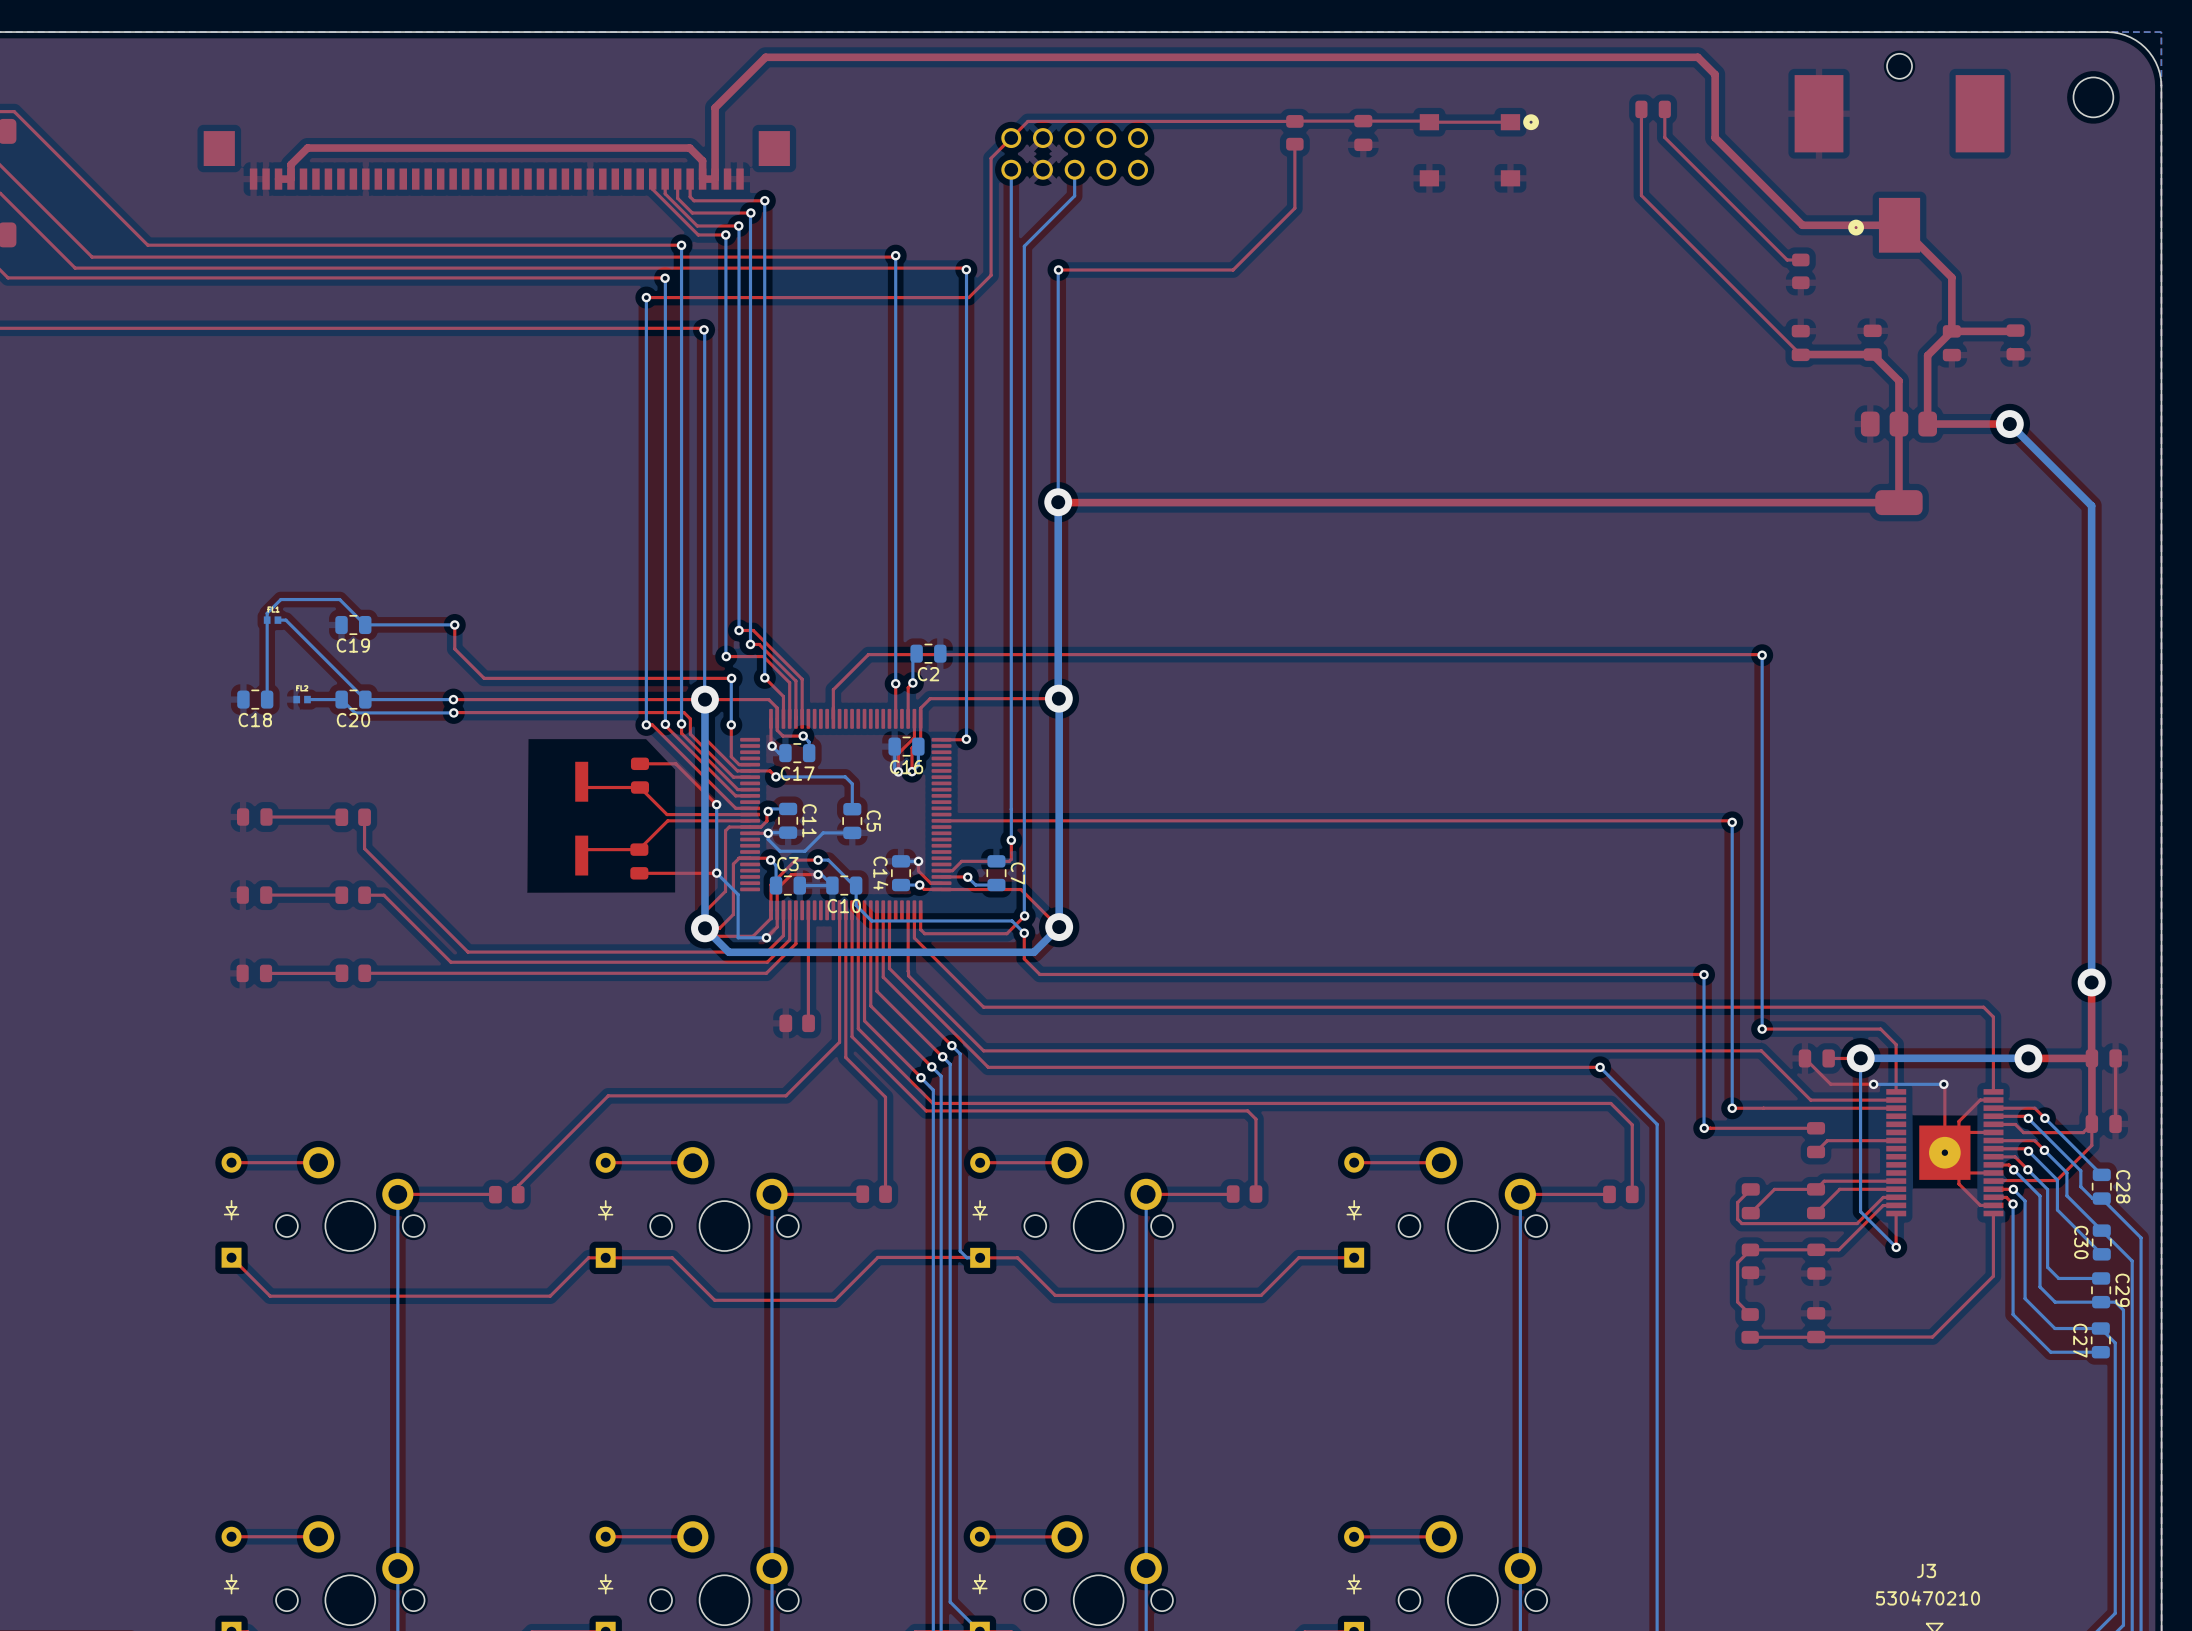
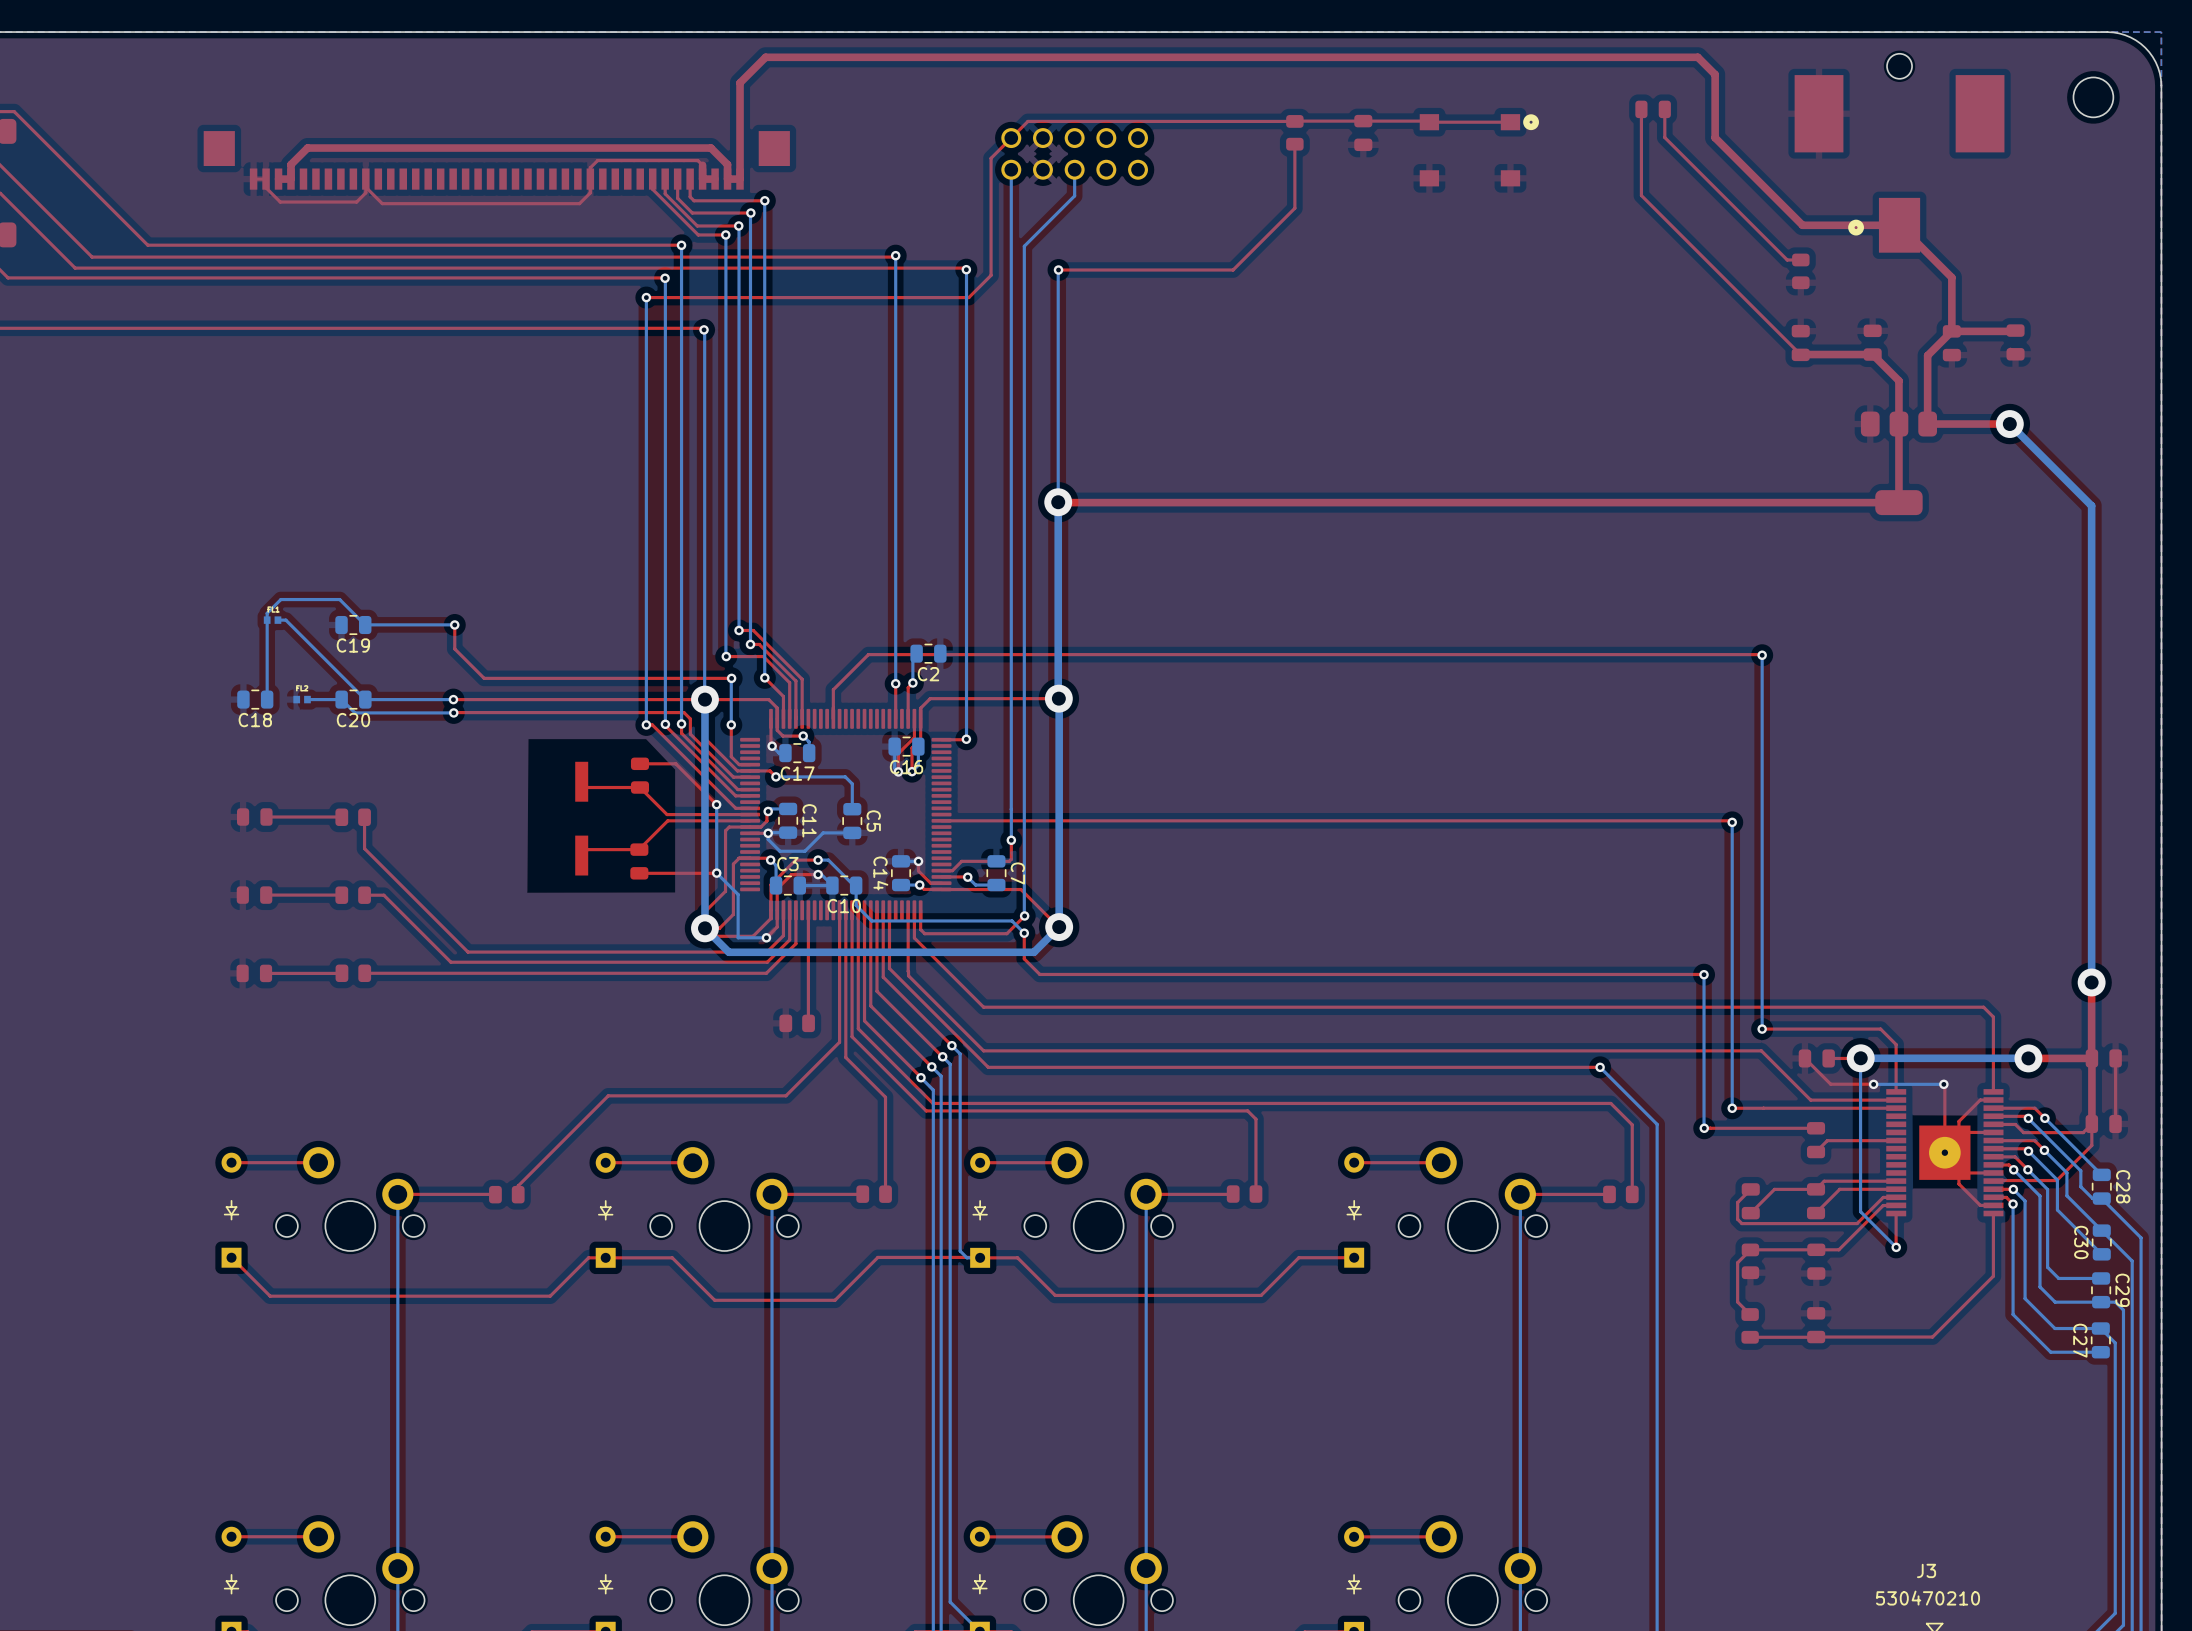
top track: (740, 82) (715, 107) (715, 179) -> (740, 82) (740, 179) (727, 179) (727, 164) (710, 148) (689, 148)
top track: (689, 148) (702, 160) (702, 165) -> (365, 187) (382, 203) (579, 203) (590, 192) (590, 167) (597, 160) (697, 160) (702, 165)
top track: none -> (365, 179) (365, 192) (356, 202) (280, 202) (266, 187) (266, 179) (253, 179)

